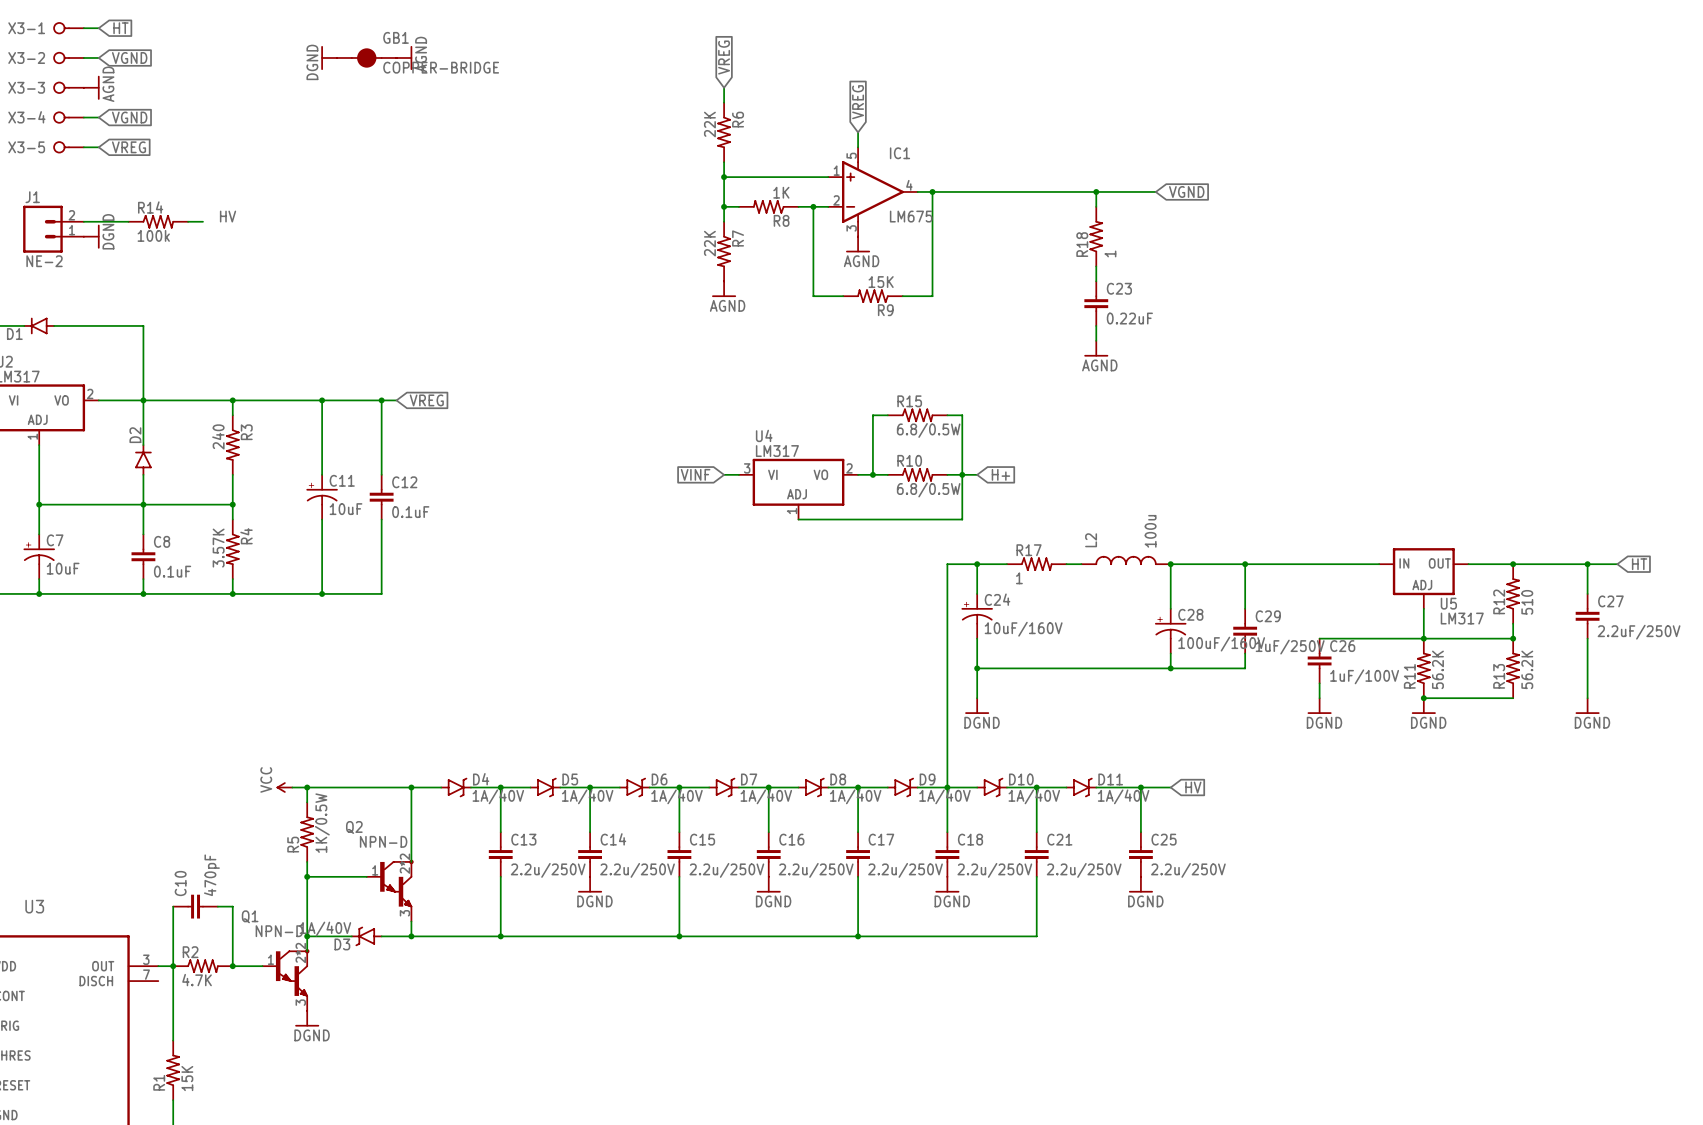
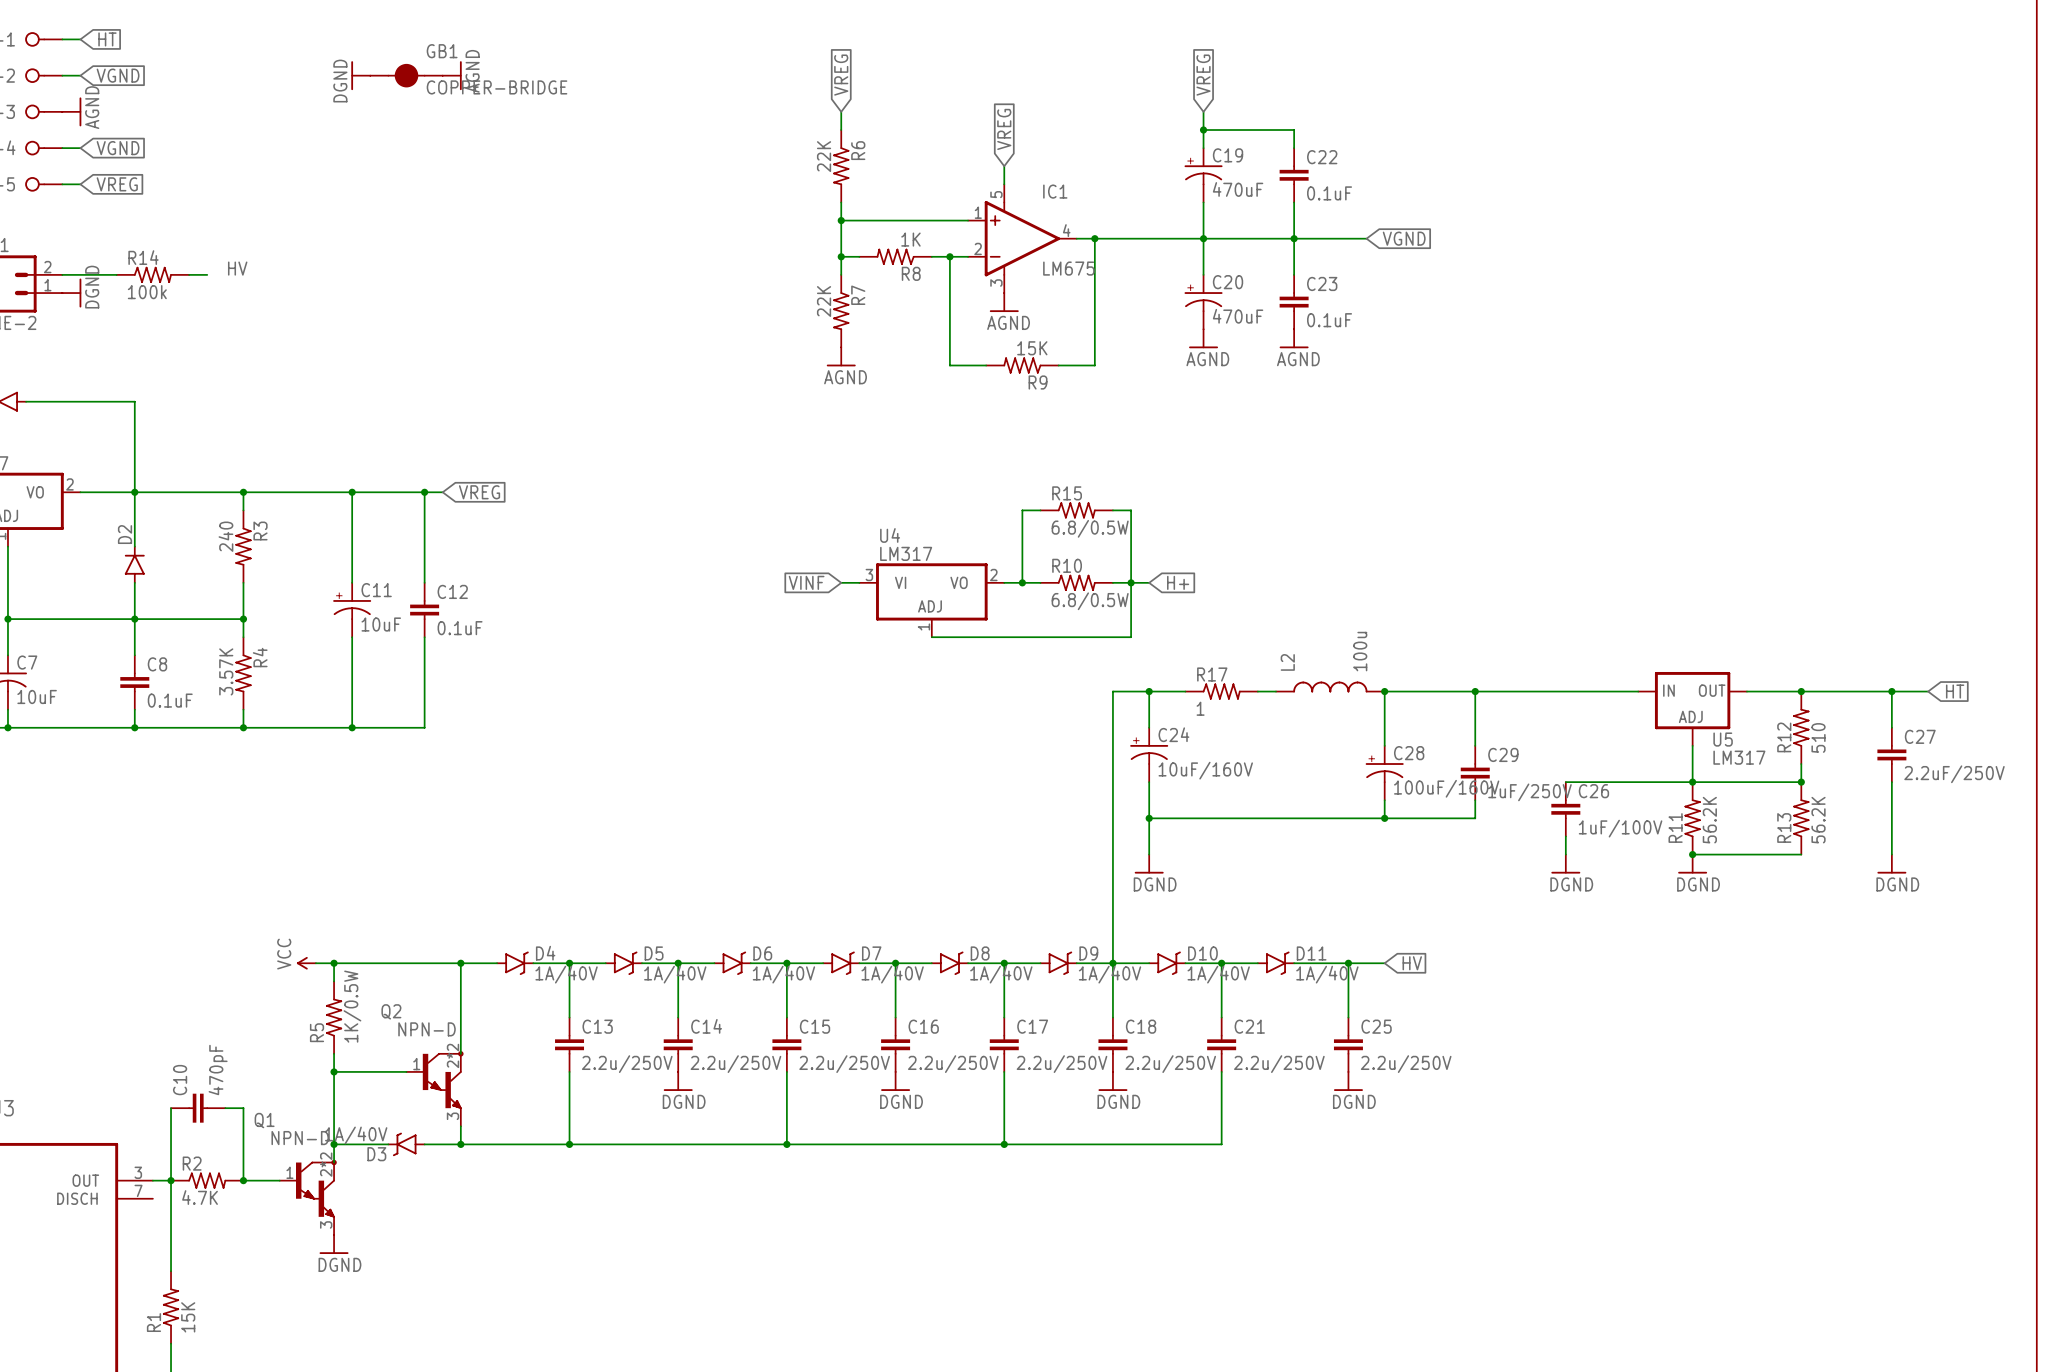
global label: none -> VREG (1203, 75)
wire: none -> (1203, 111) (1203, 148)
wire: none -> (1203, 130) (1294, 130) (1294, 148)
junction: none -> (1203, 130)
C19: none -> 470uF (1203, 175)
C22: none -> 0.1uF (1294, 175)
wire: none -> (1203, 202) (1203, 274)
wire: none -> (1294, 202) (1294, 238)
junction: none -> (1203, 238)
R18: 1 (1096, 236) -> none
C20: none -> 470uF (1203, 302)
power symbol: none -> AGND (1203, 338)
power symbol: none -> AGND (1294, 338)
C23 position: (1096, 303) -> (1294, 302)
C23 value: 0.22uF (1129, 318) -> 0.1uF (1329, 320)
wire: (1096, 325) (1096, 340) -> none
power symbol: AGND (1096, 348) -> none

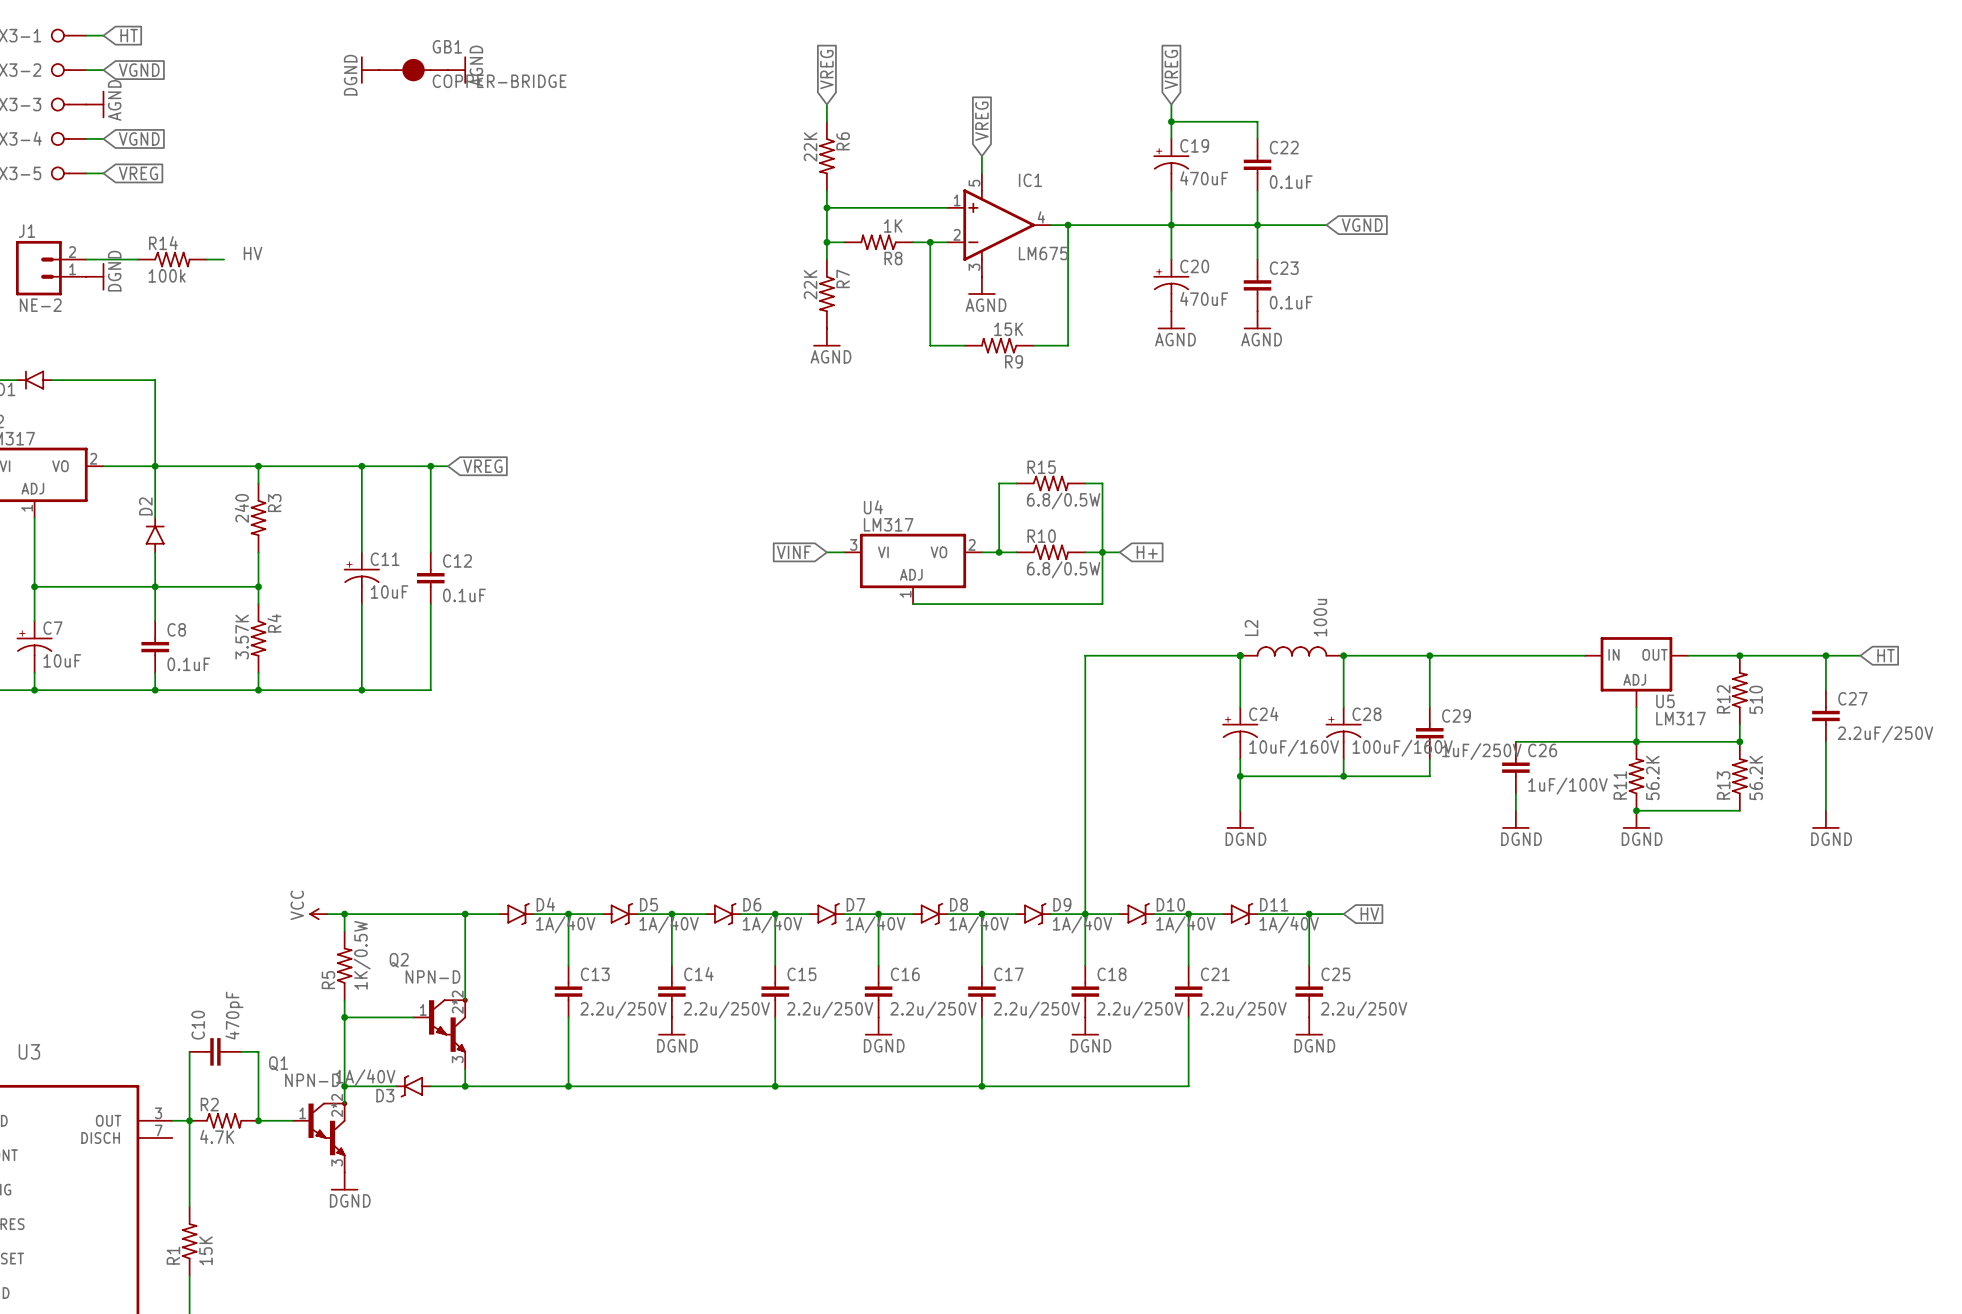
wire: (1149, 691) (1149, 727) -> none
junction: (1149, 691) -> none
R17: 1 (1221, 691) -> none
wire: none -> (1240, 655) (1240, 707)
junction: none -> (1240, 655)
C24 position: (1149, 754) -> (1240, 733)
wire: (1149, 782) (1149, 854) -> none
wire: none -> (1240, 759) (1240, 810)
wire: (1149, 818) (1275, 818) -> none
junction: (1149, 818) -> none
junction: none -> (1240, 776)
power symbol position: DGND (1149, 864) -> DGND (1240, 819)

